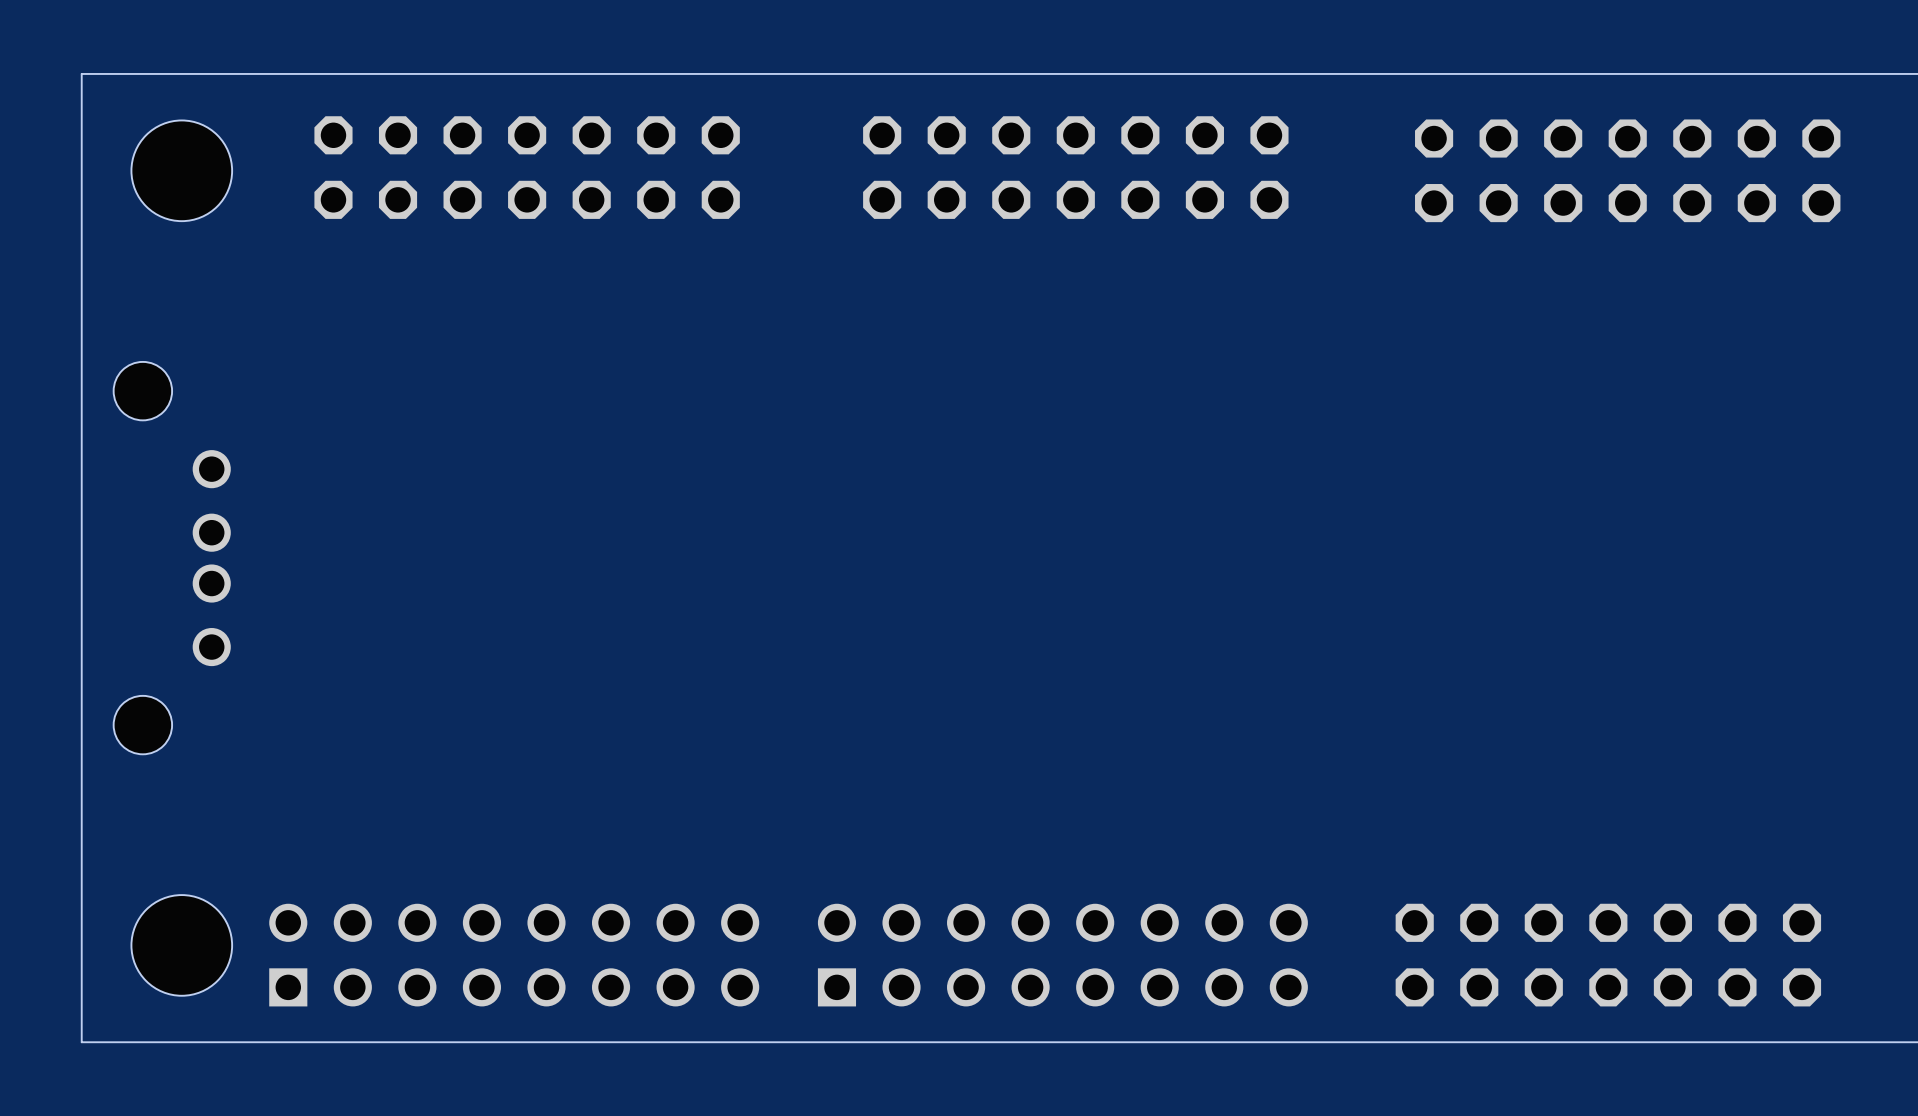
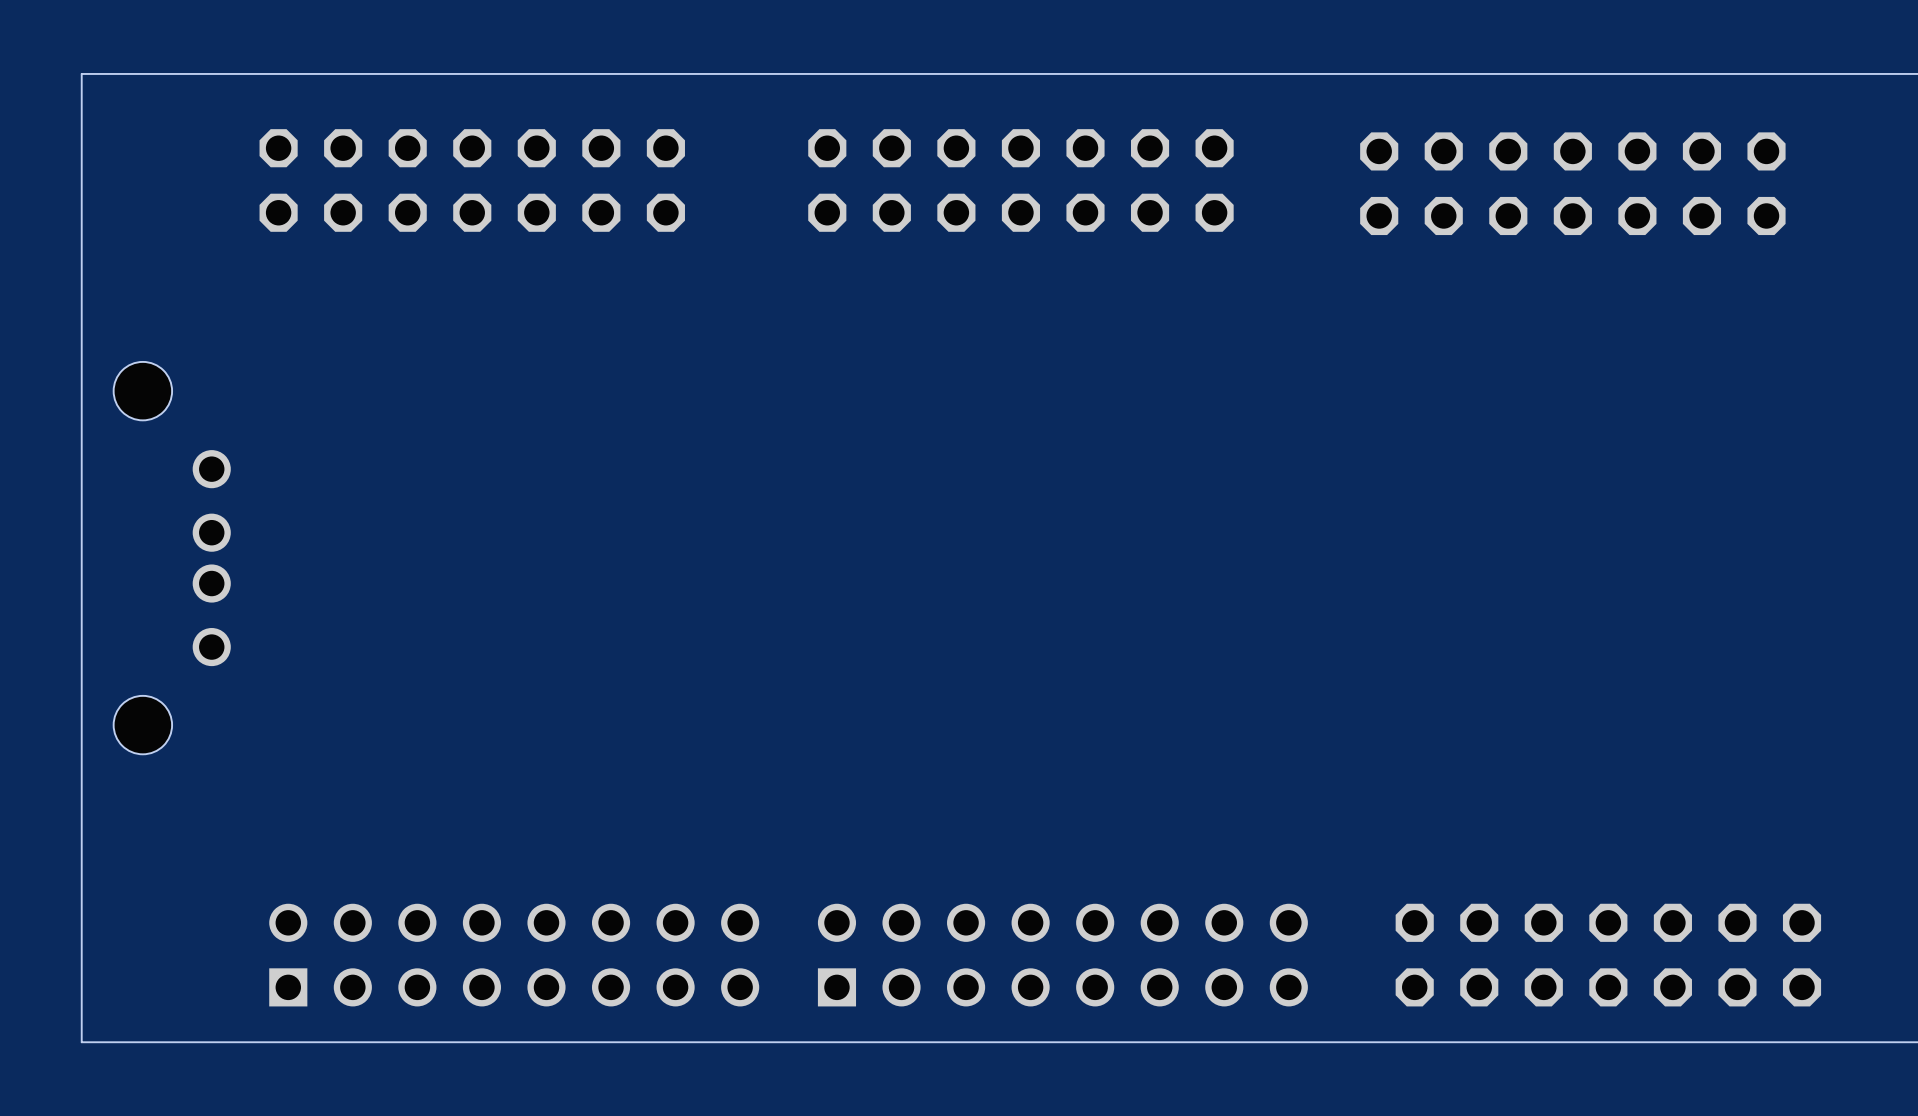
part position: (527, 167) -> (472, 180)
part position: (1075, 167) -> (1020, 180)
hole: (181, 170) -> none
part position: (1627, 170) -> (1572, 183)
hole: (181, 945) -> none

